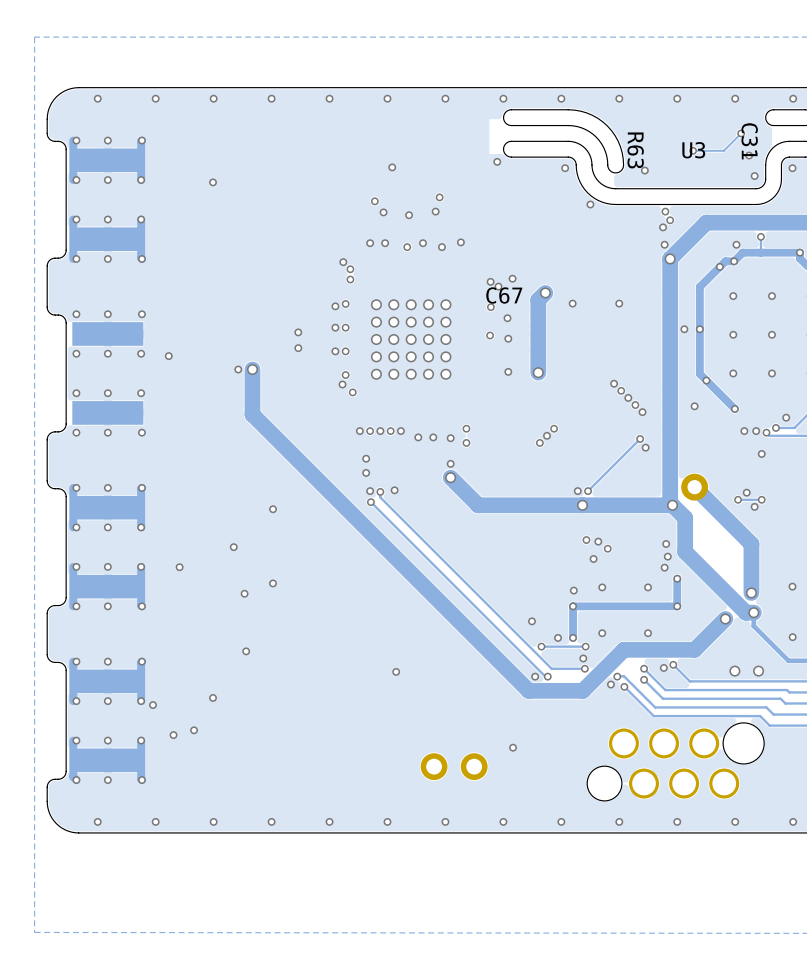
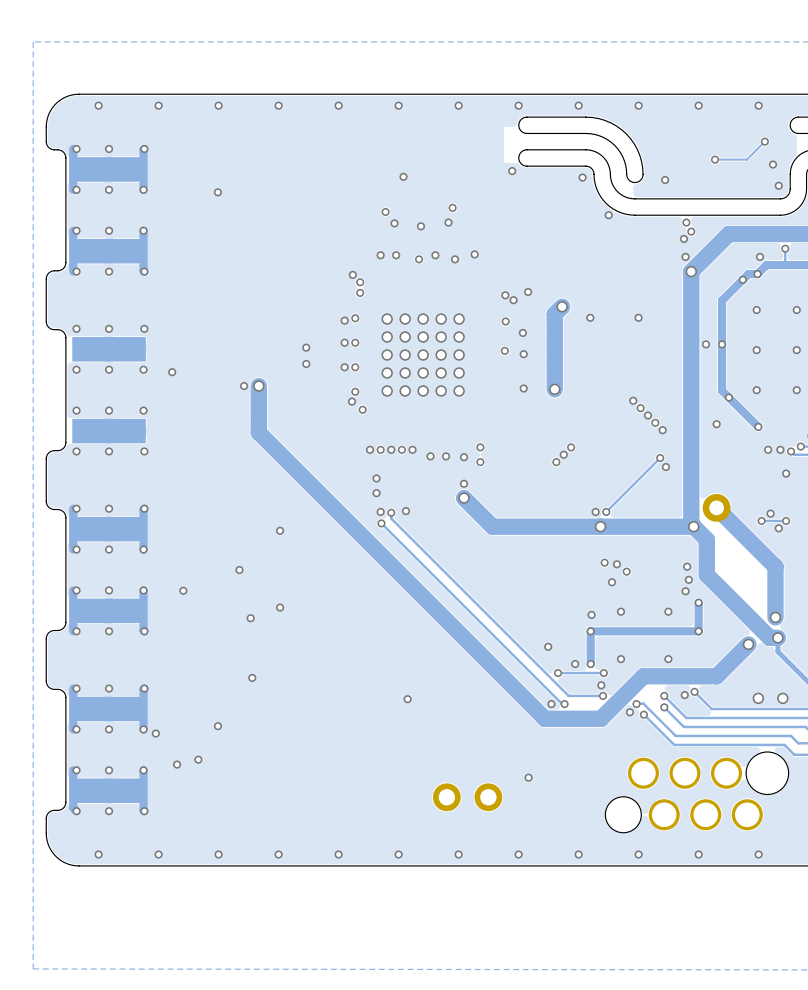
C31: (749, 141) -> none
R63: (635, 150) -> none
U3: (693, 150) -> none
C67: (504, 295) -> none

